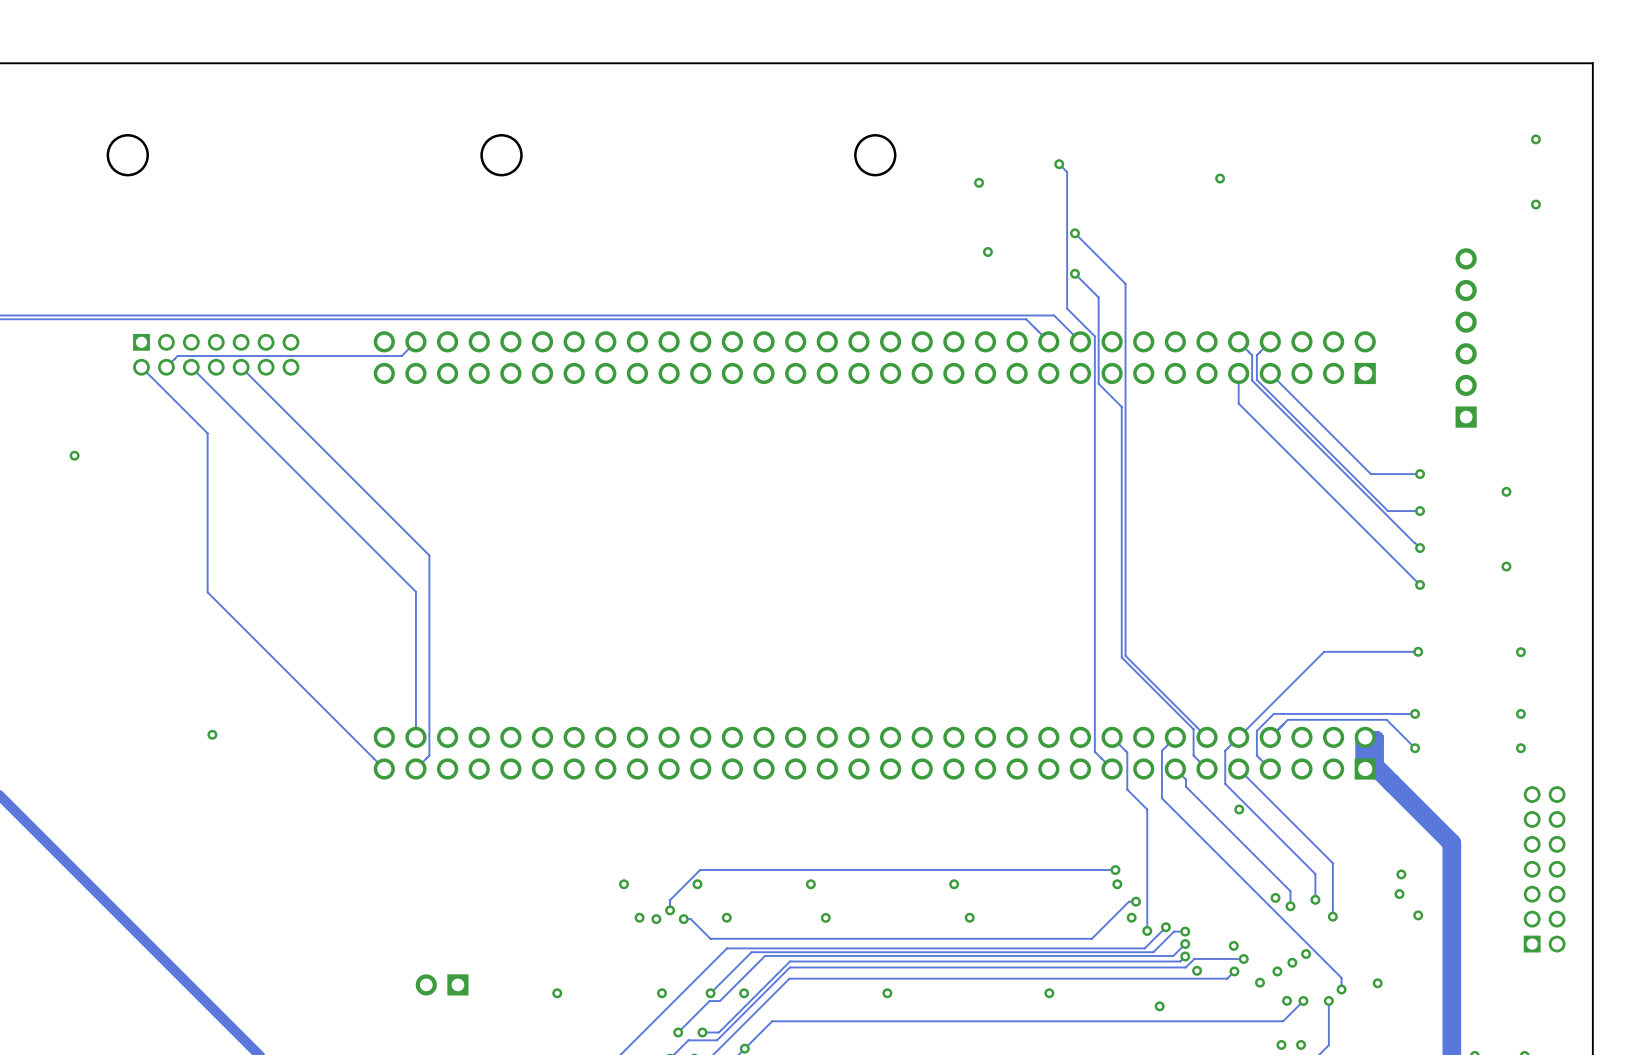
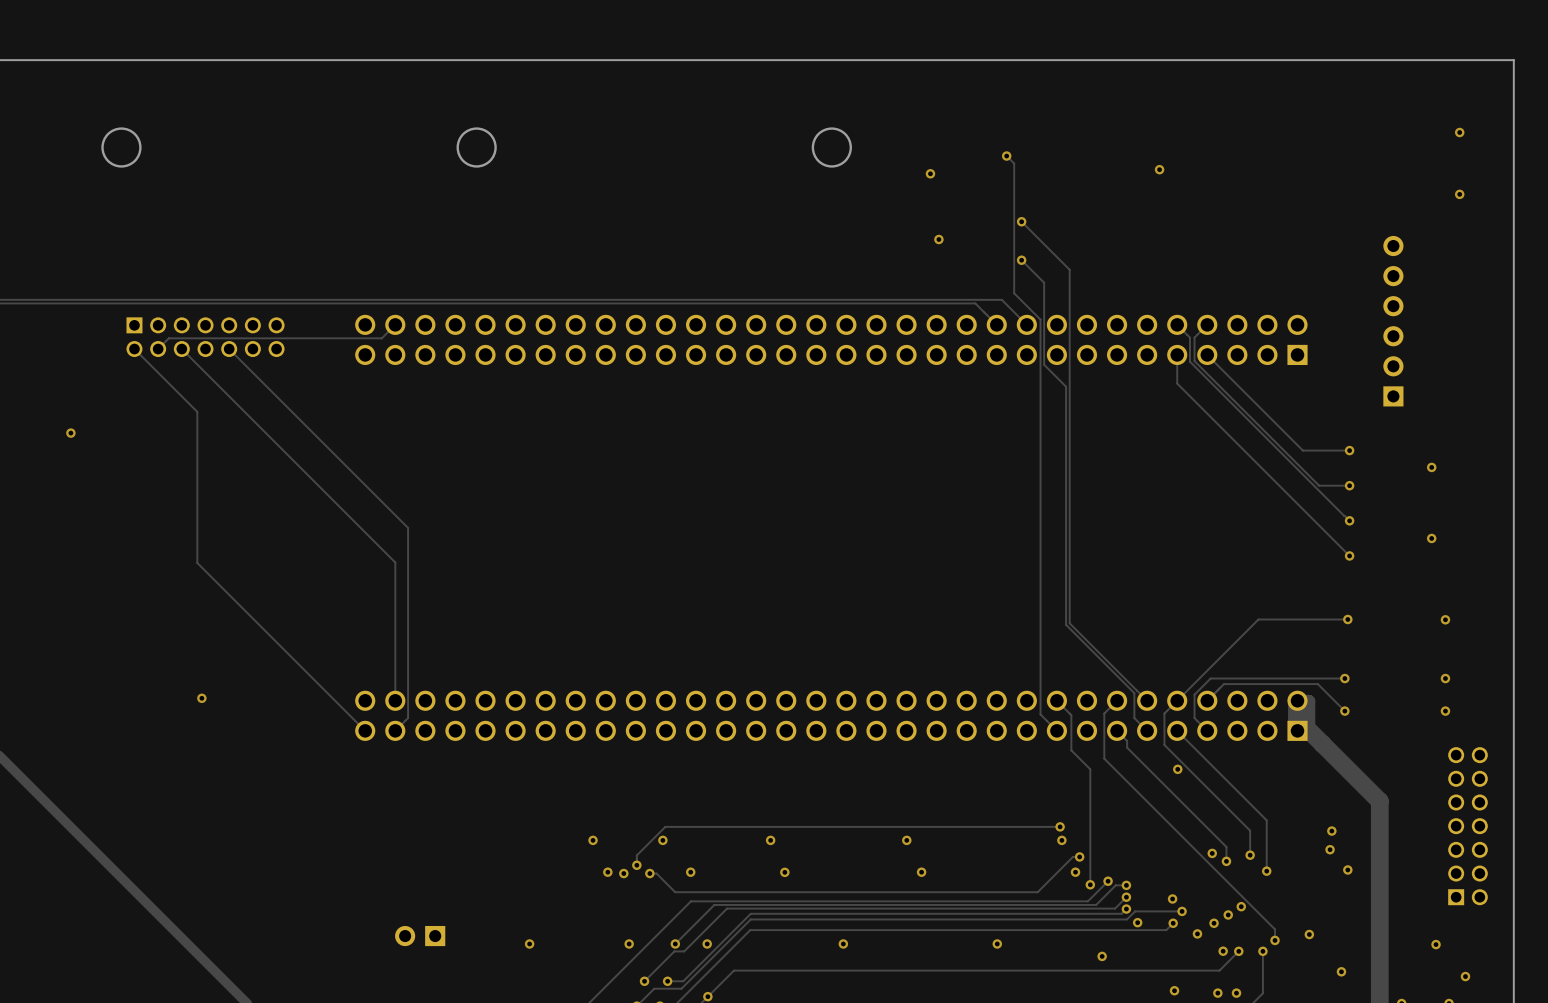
via: none -> (1436, 944)
via: none -> (1341, 971)
via: none -> (1465, 976)
via: none -> (1174, 990)

